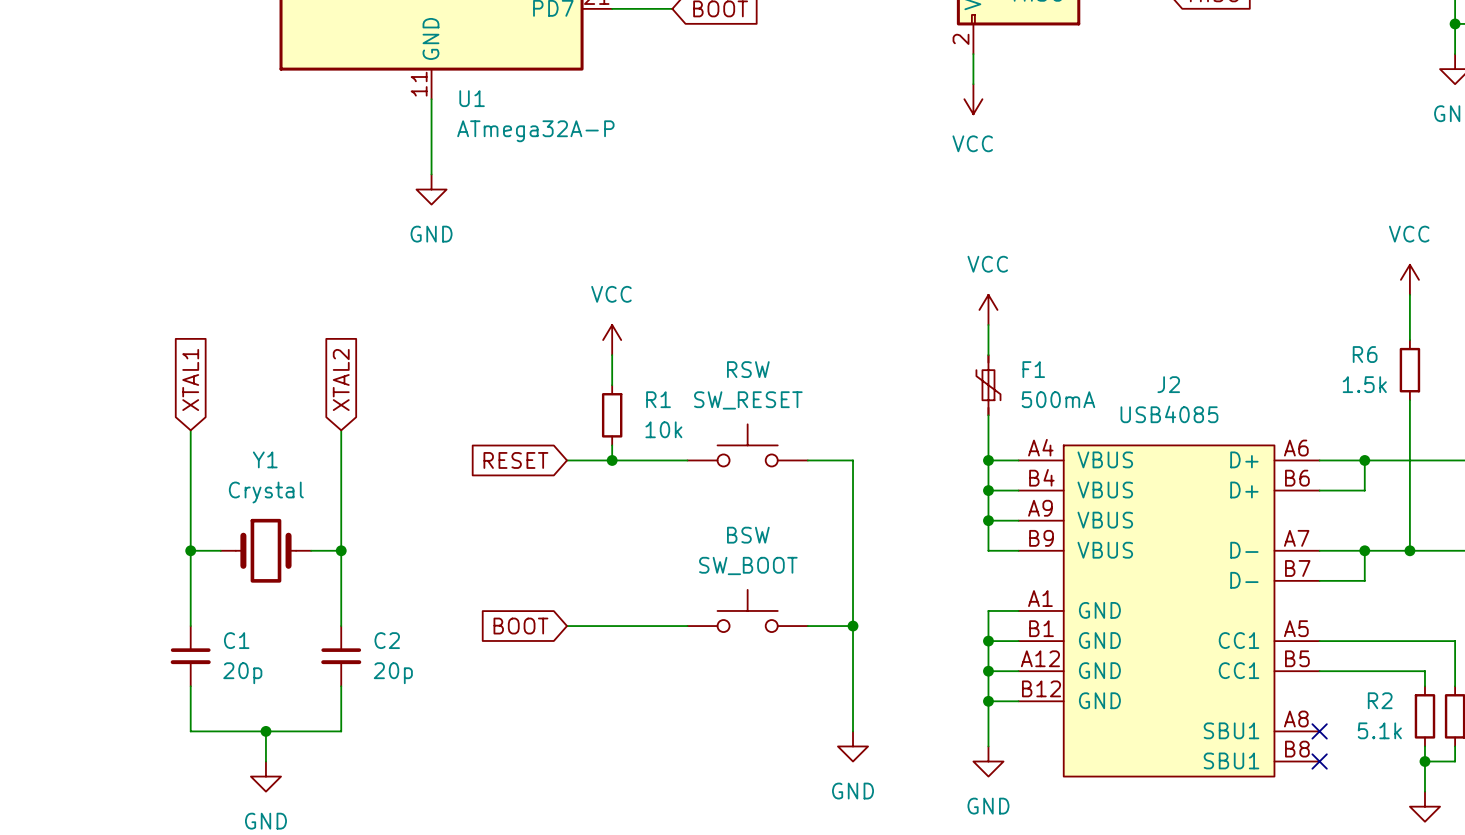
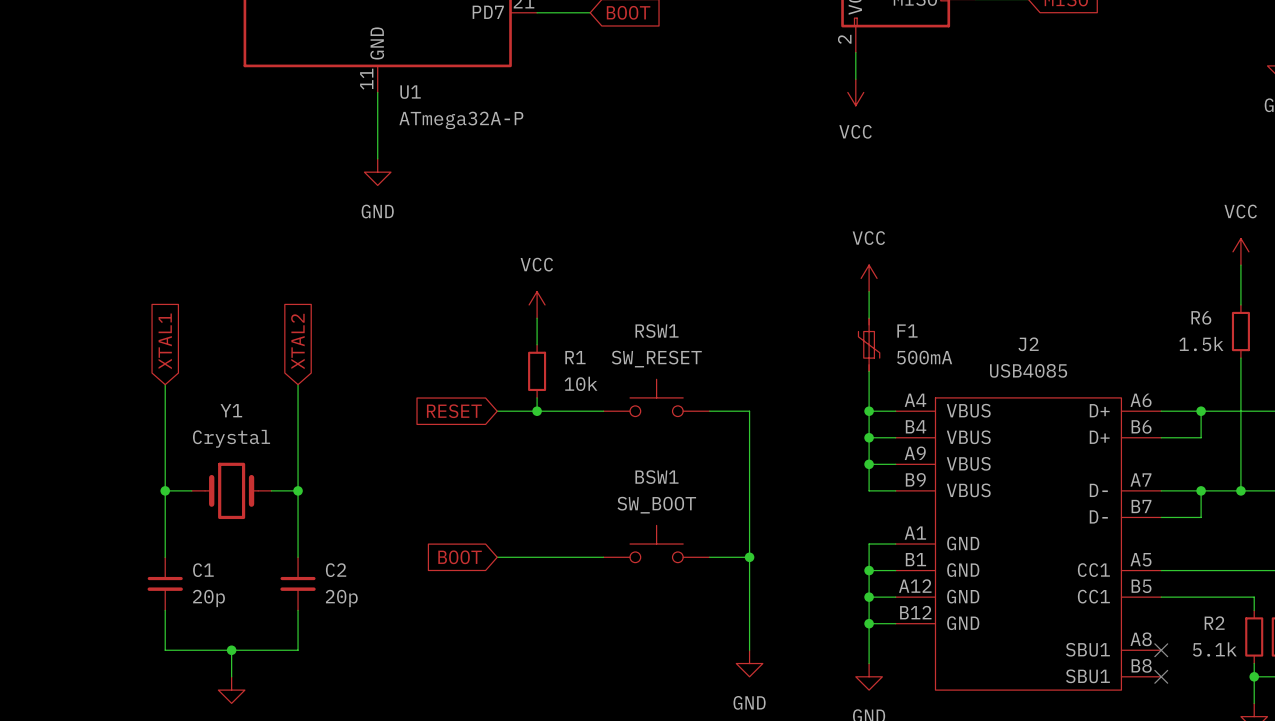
RSW name: RSW (748, 369) -> RSW1 (657, 331)
BSW name: BSW (748, 535) -> BSW1 (656, 477)

